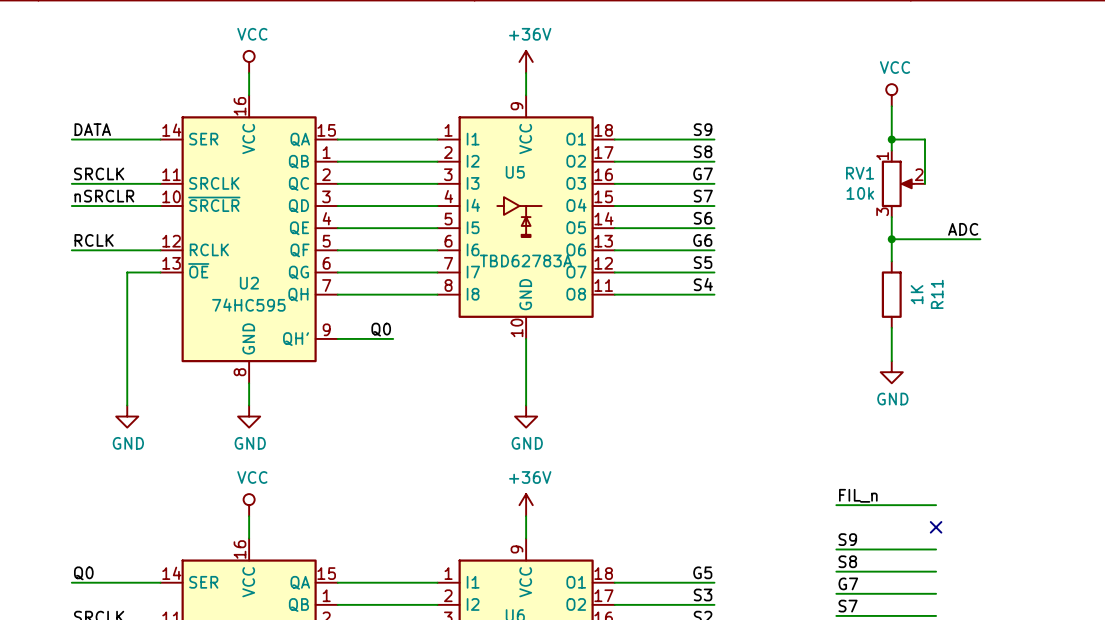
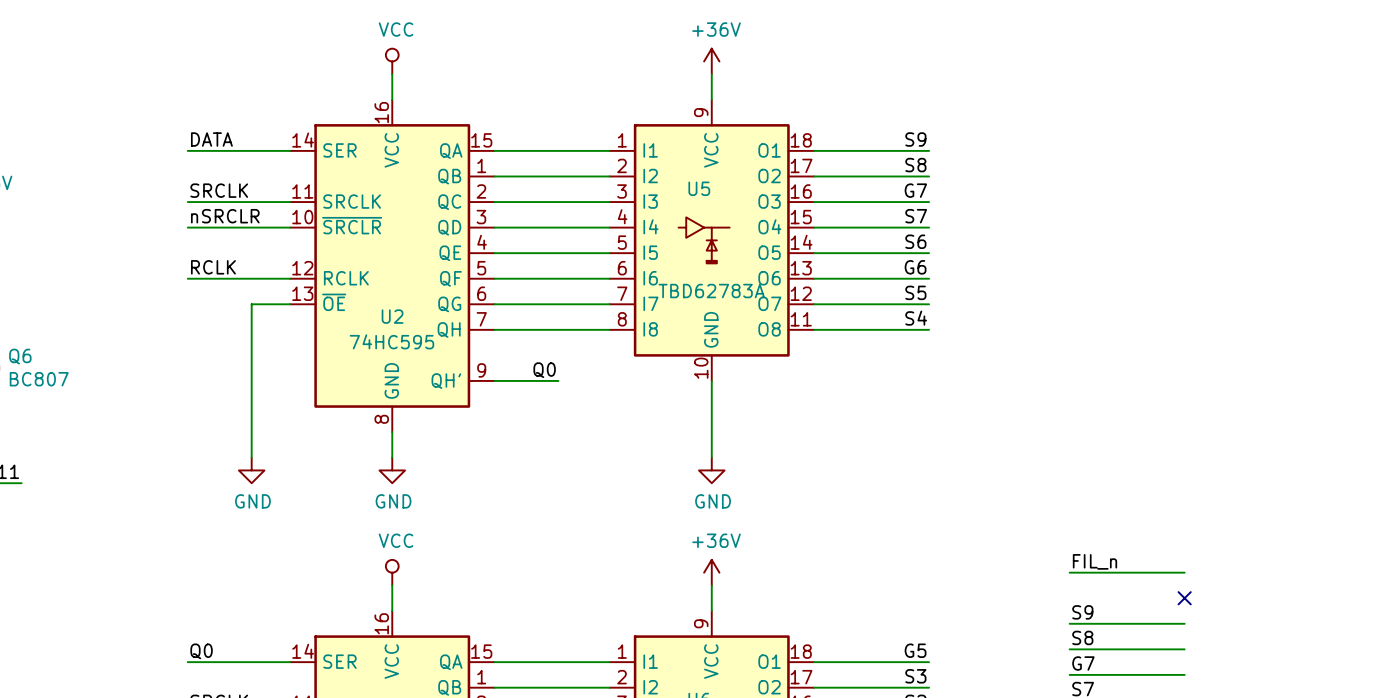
power symbol: VCC (891, 95) -> none
wire: (891, 106) (891, 150) -> none
wire: (891, 139) (924, 139) (924, 183) -> none
junction: (891, 139) -> none
RV1: 10k (903, 183) -> none
wire: (891, 217) (891, 261) -> none
label: ADC (963, 229) -> none
wire: (891, 239) (980, 239) -> none
junction: (891, 239) -> none
R11: 1K (891, 294) -> none
wire: (891, 327) (891, 361) -> none
power symbol: GND (891, 372) -> none

